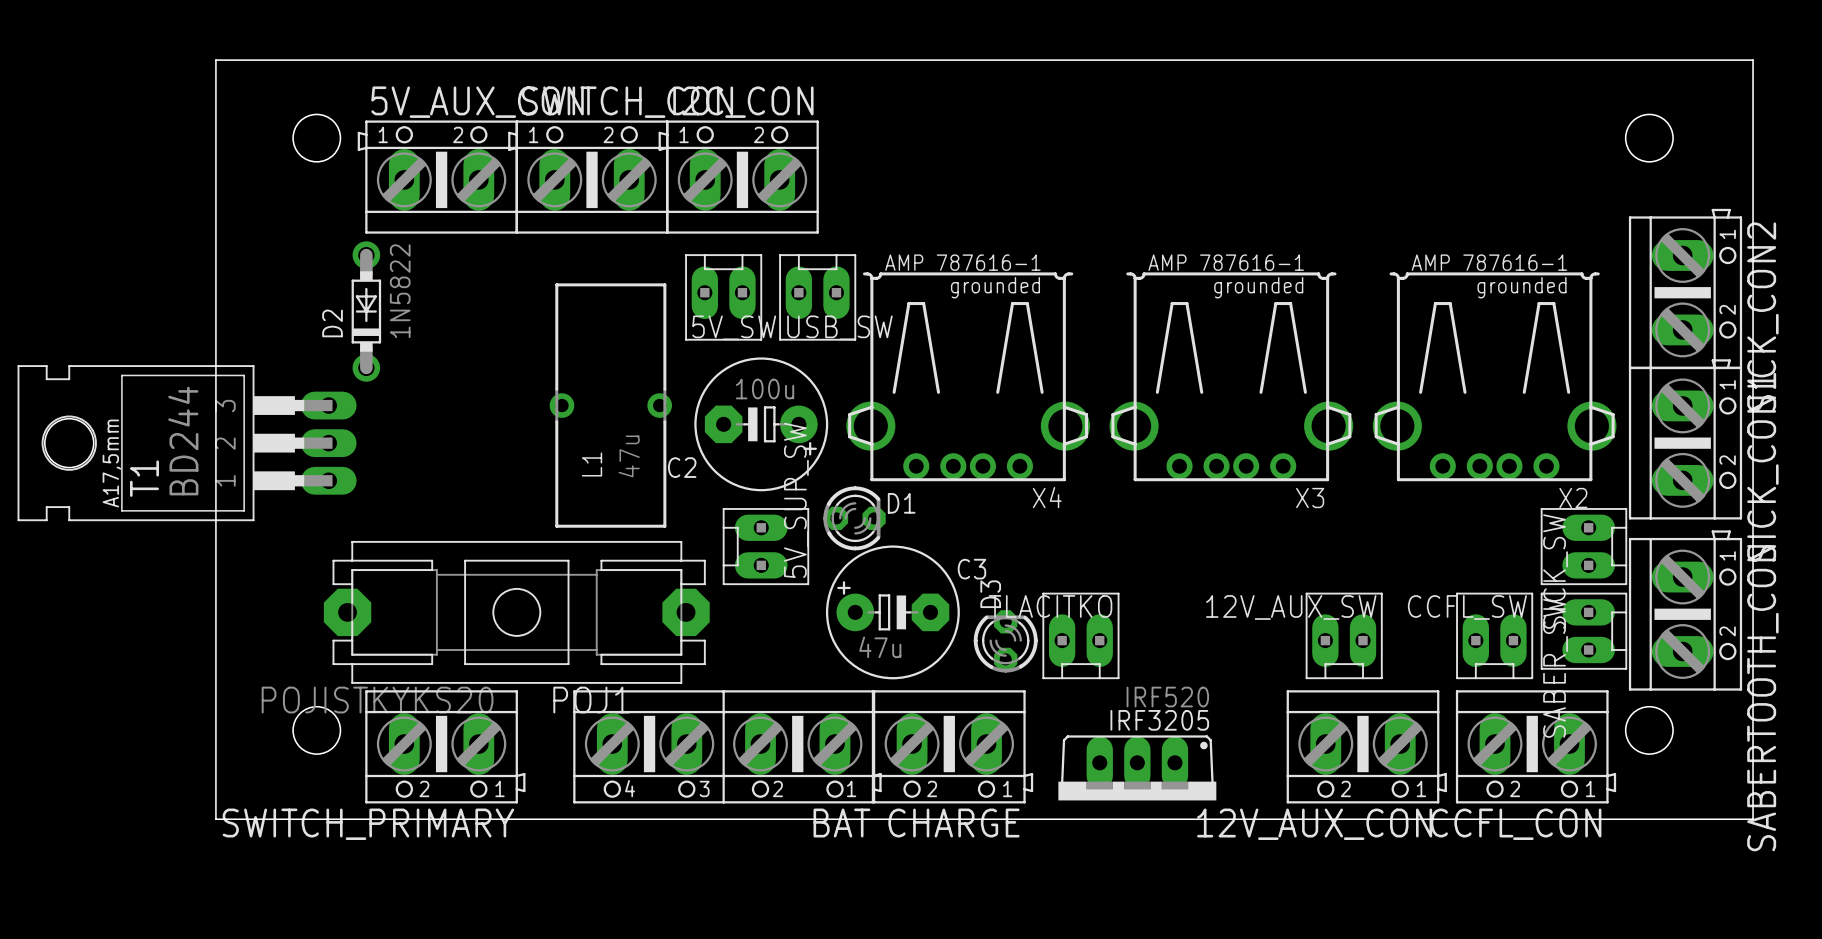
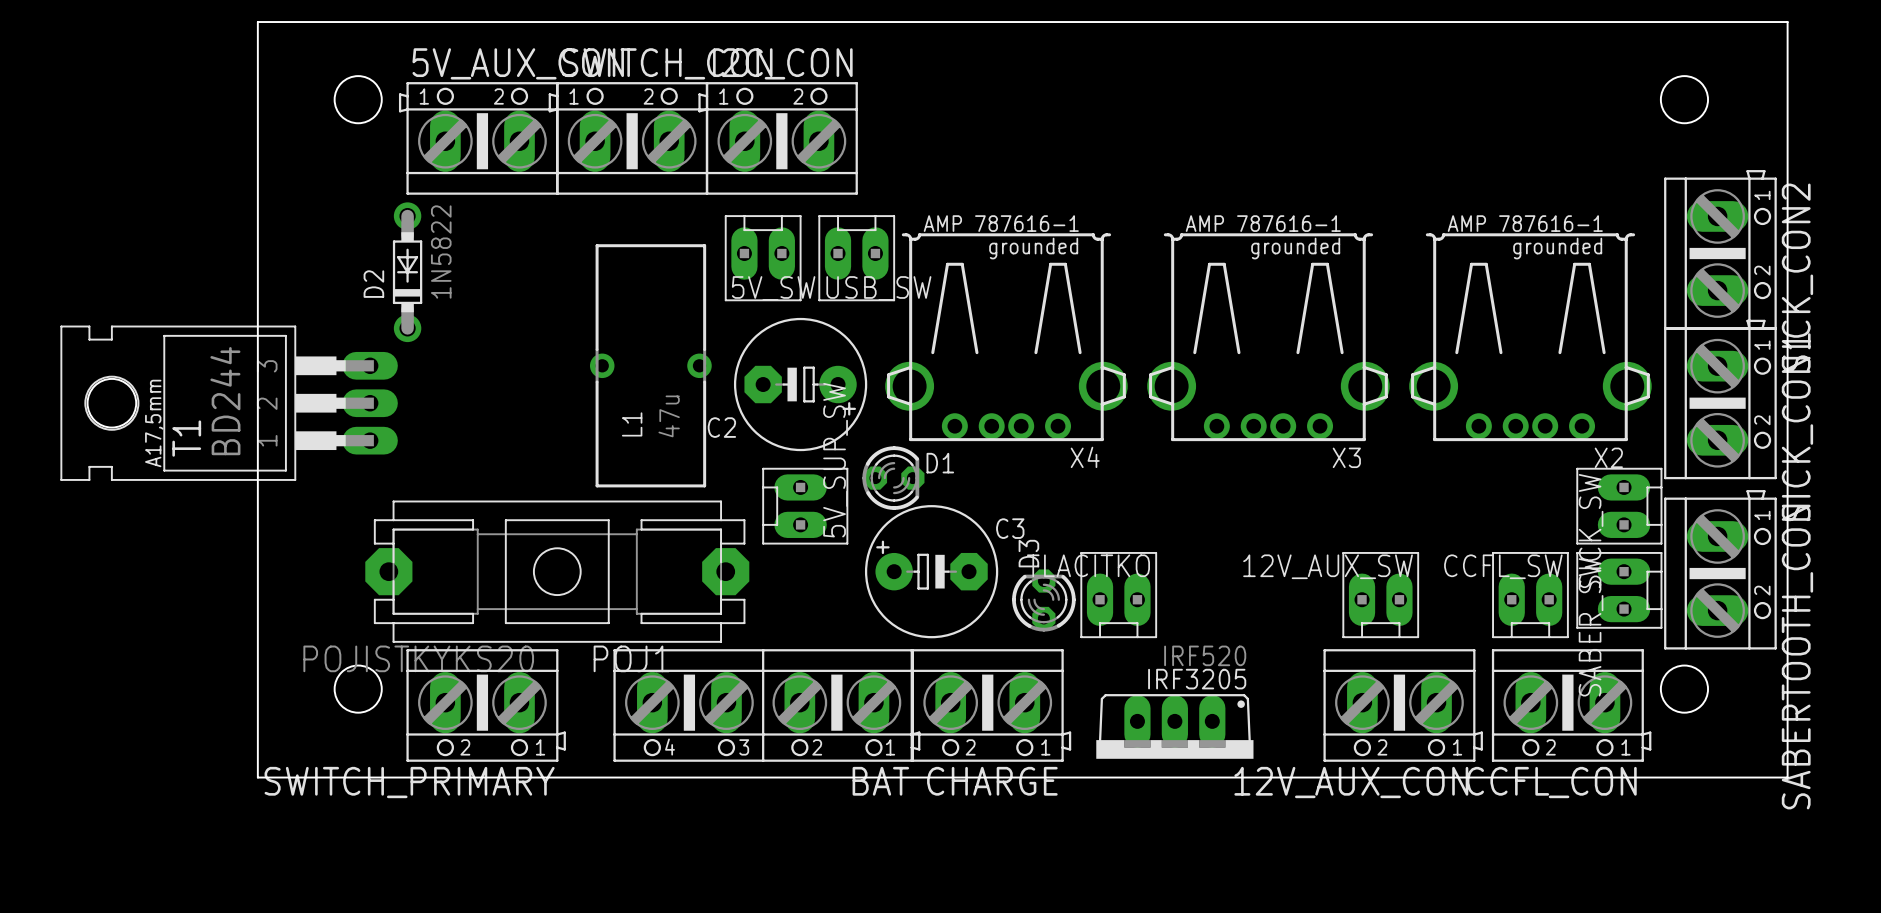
C2 value: 100u (765, 389) -> none
C3 value: 47u (880, 647) -> none

